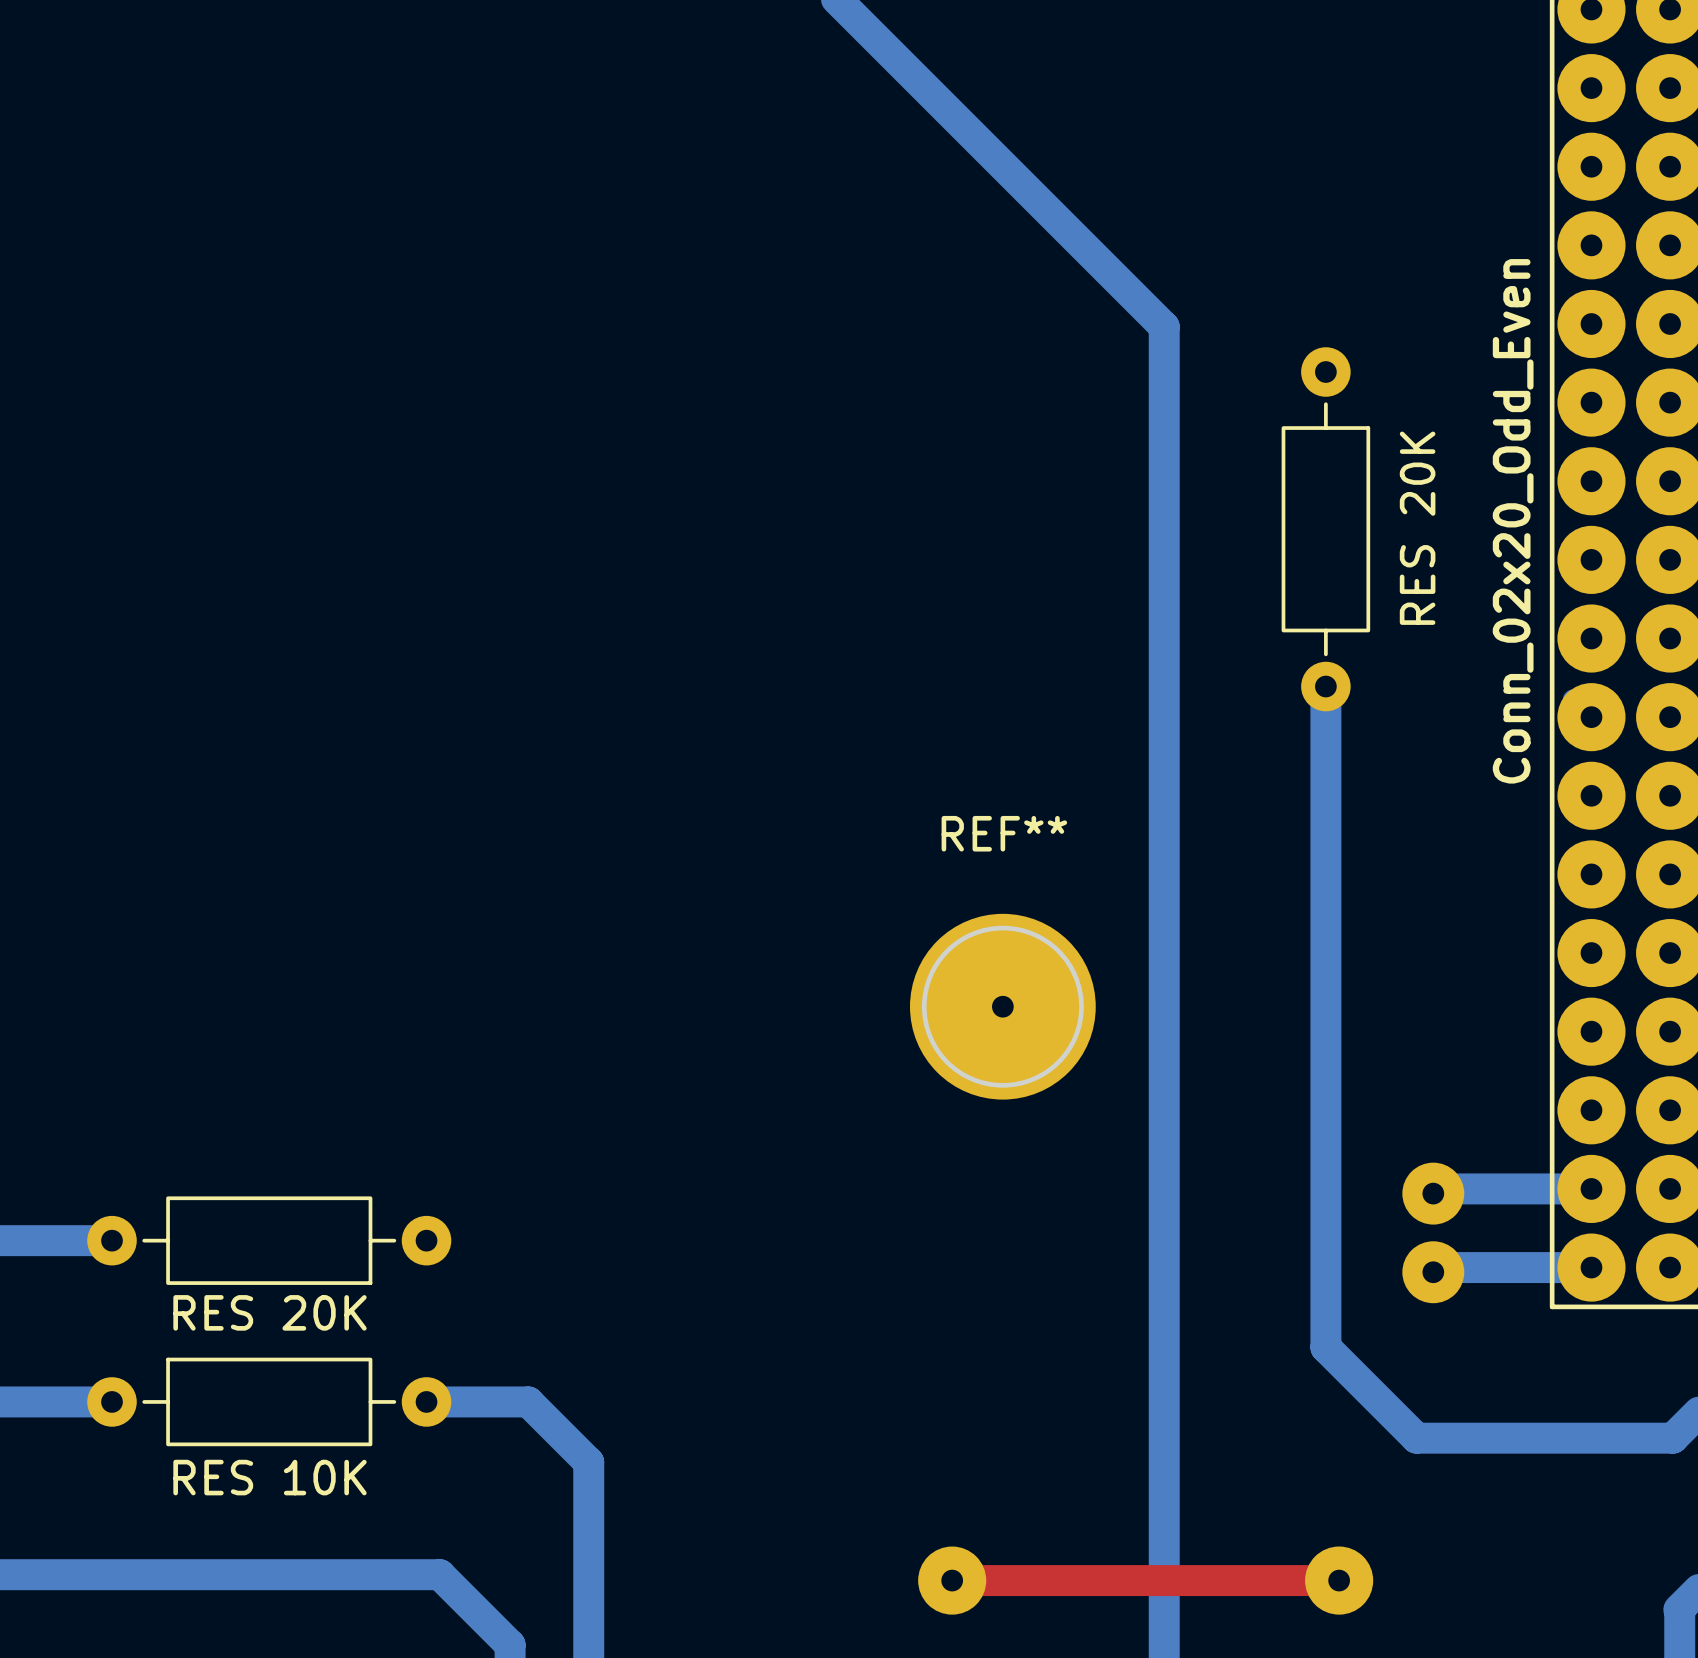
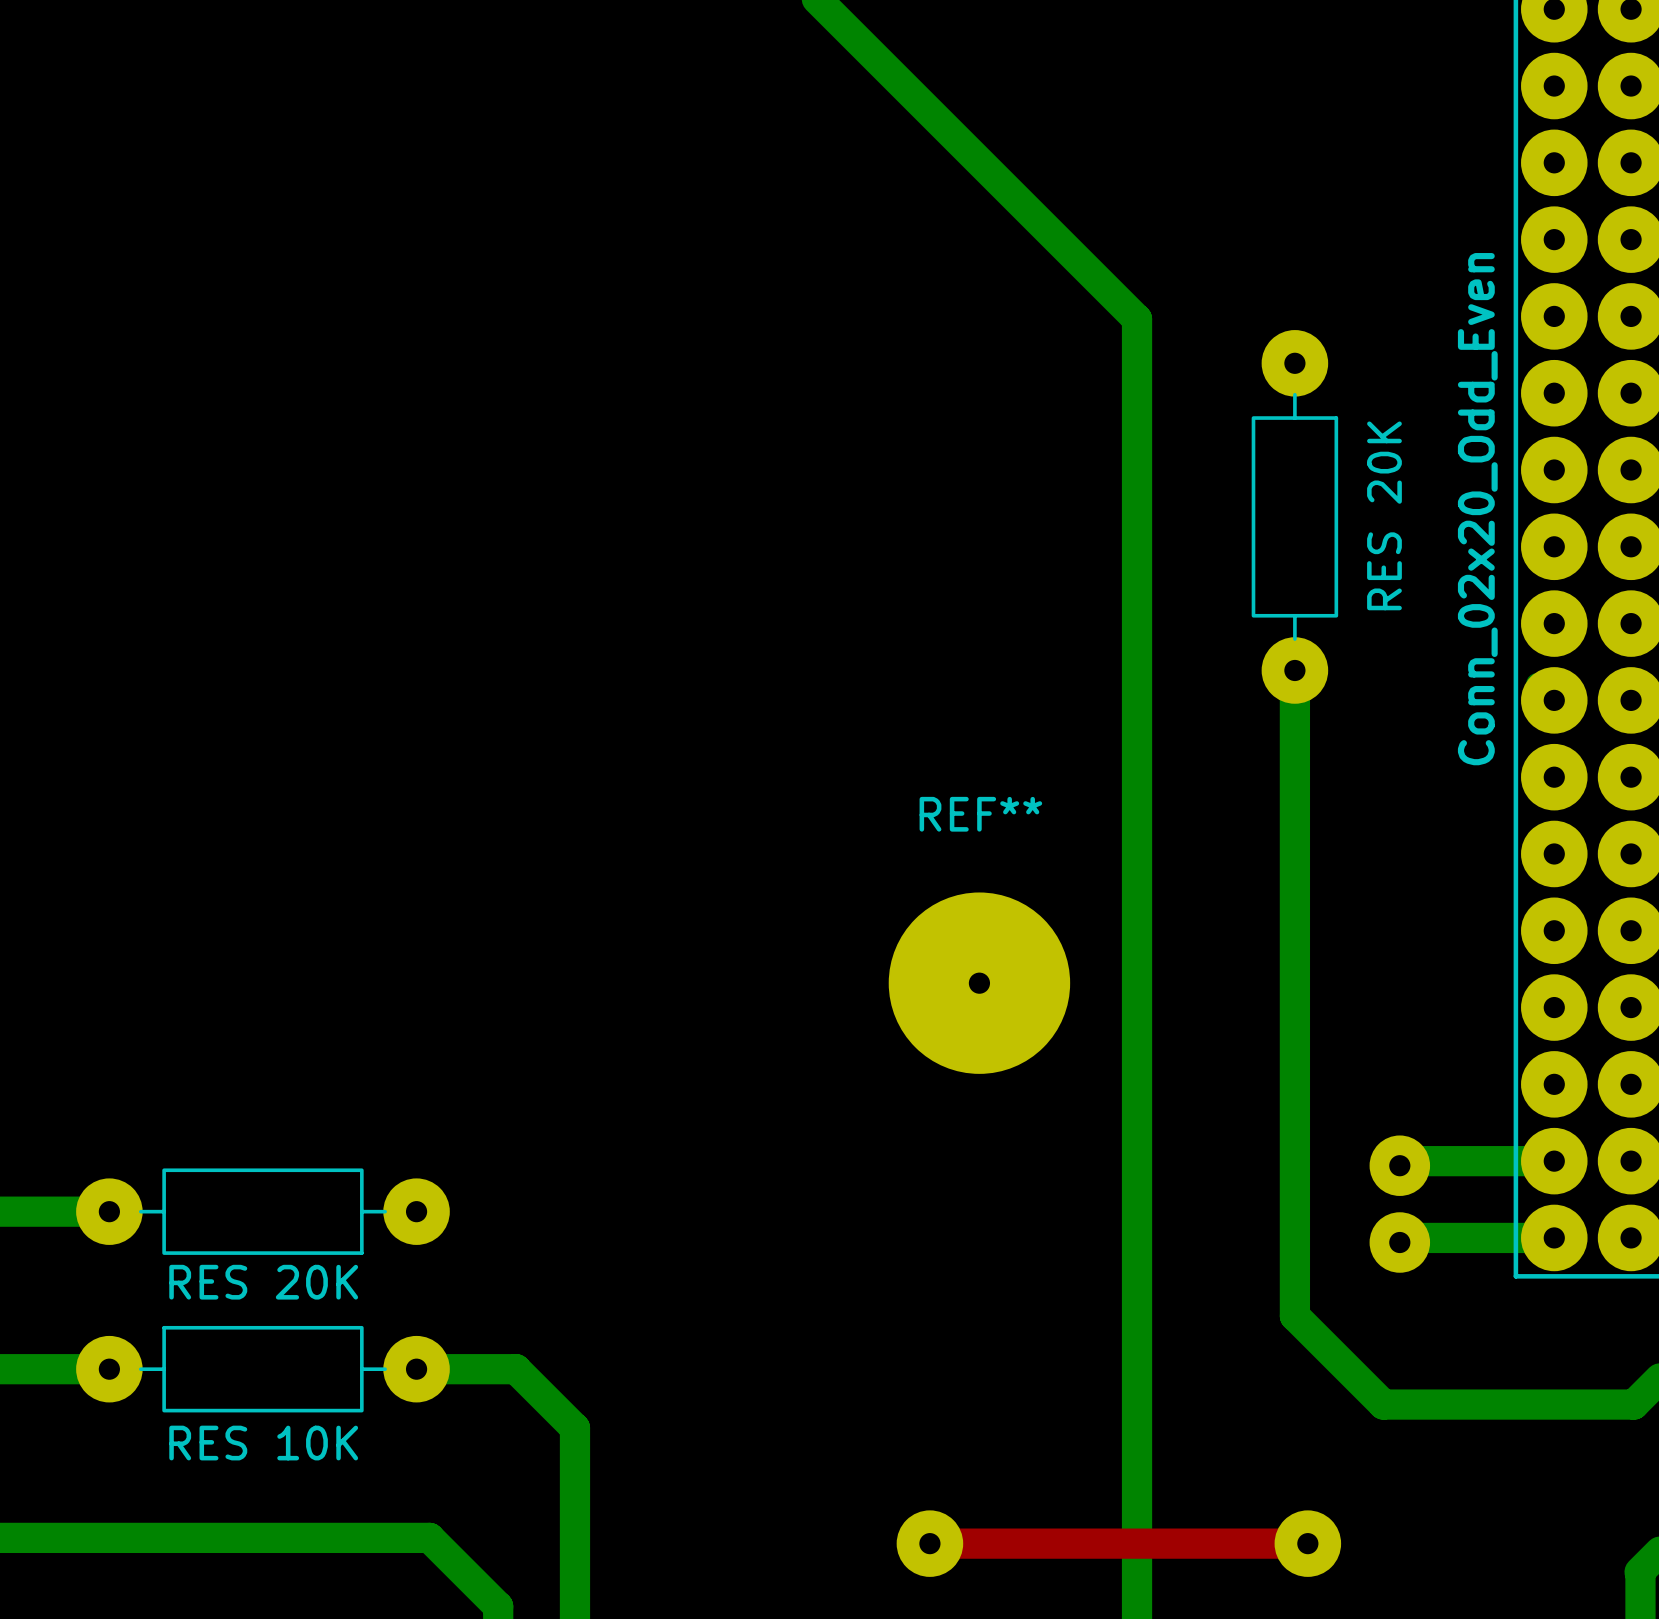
part footprint: [1281, 347, 1371, 712] -> [1251, 330, 1339, 704]
RES 20K footprint: [87, 1196, 452, 1285] -> [76, 1168, 450, 1255]
RES 10K footprint: [87, 1357, 452, 1447] -> [76, 1325, 450, 1413]

